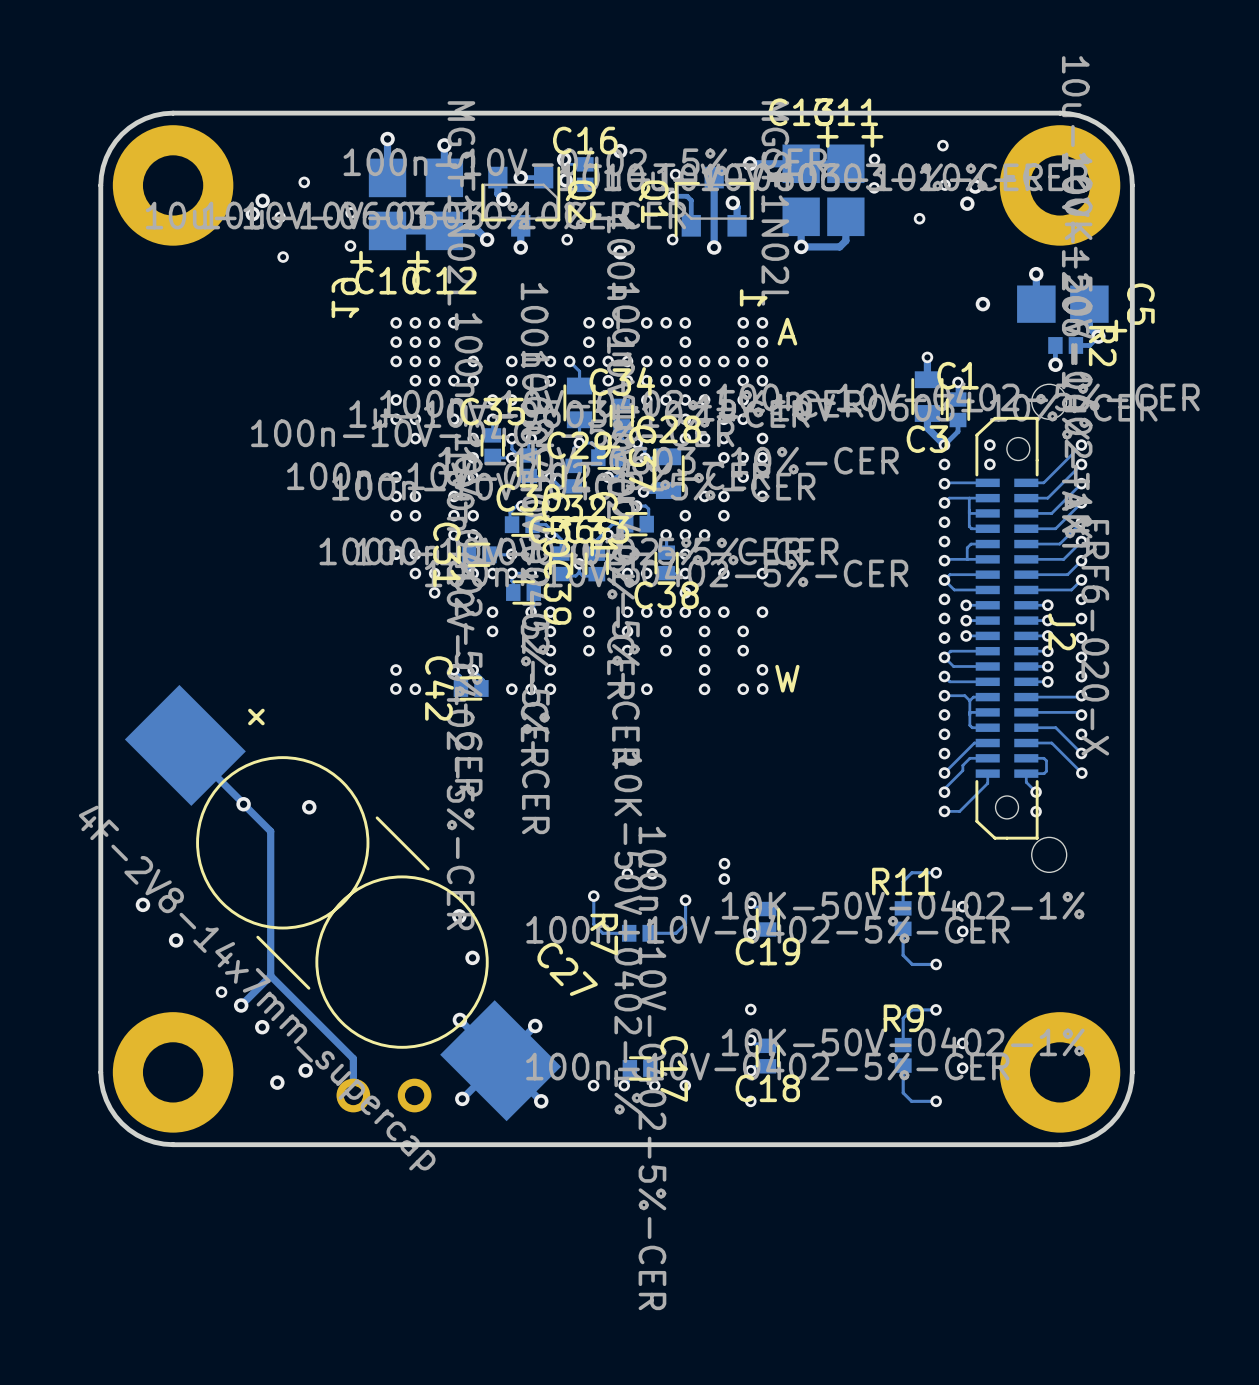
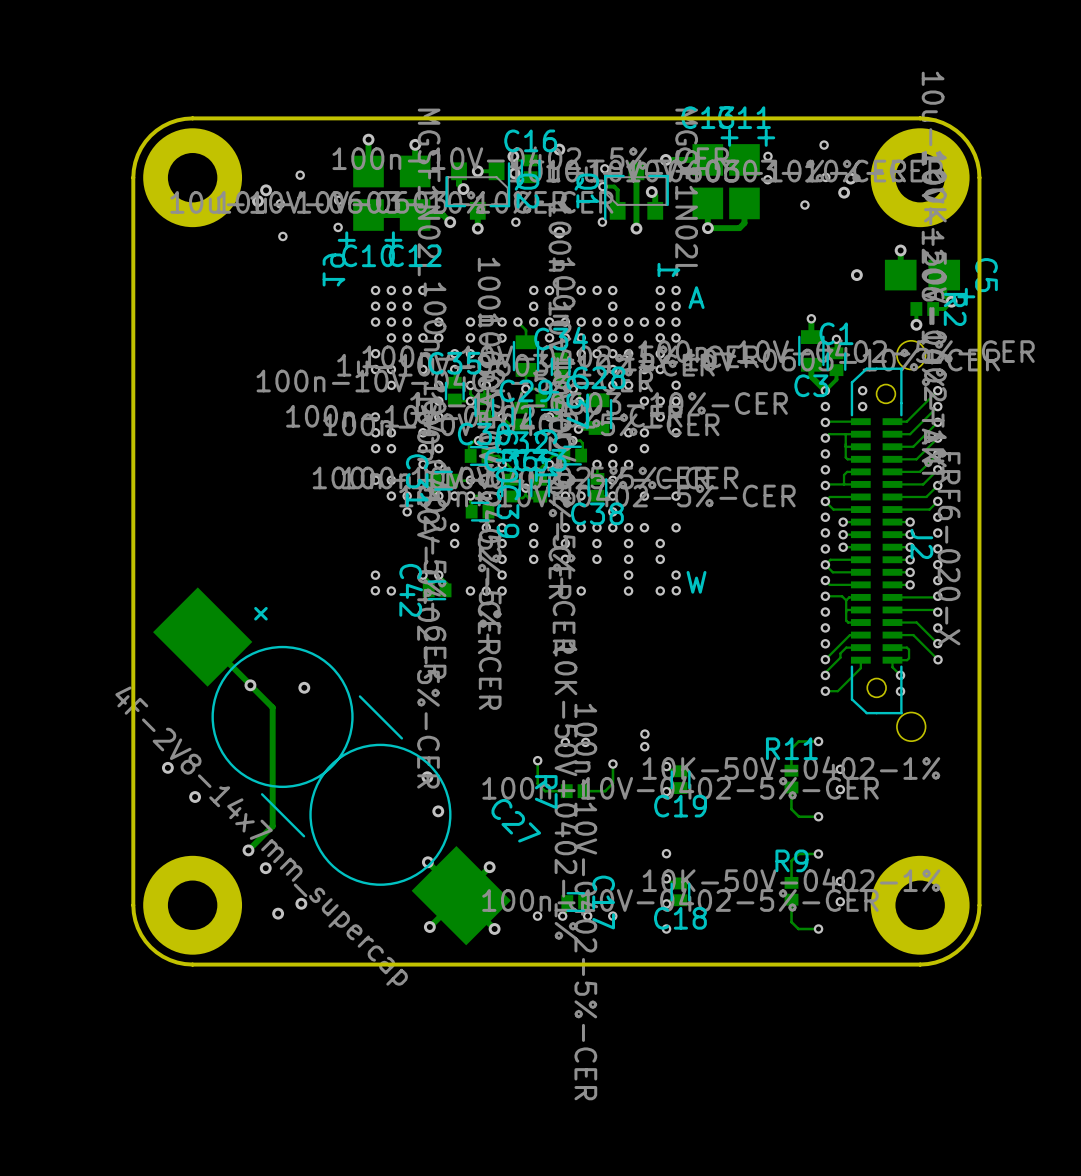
track: (270, 975) (353, 1058) (353, 1095) -> none
via: (221, 992) -> none
part: (383, 1095) -> none

